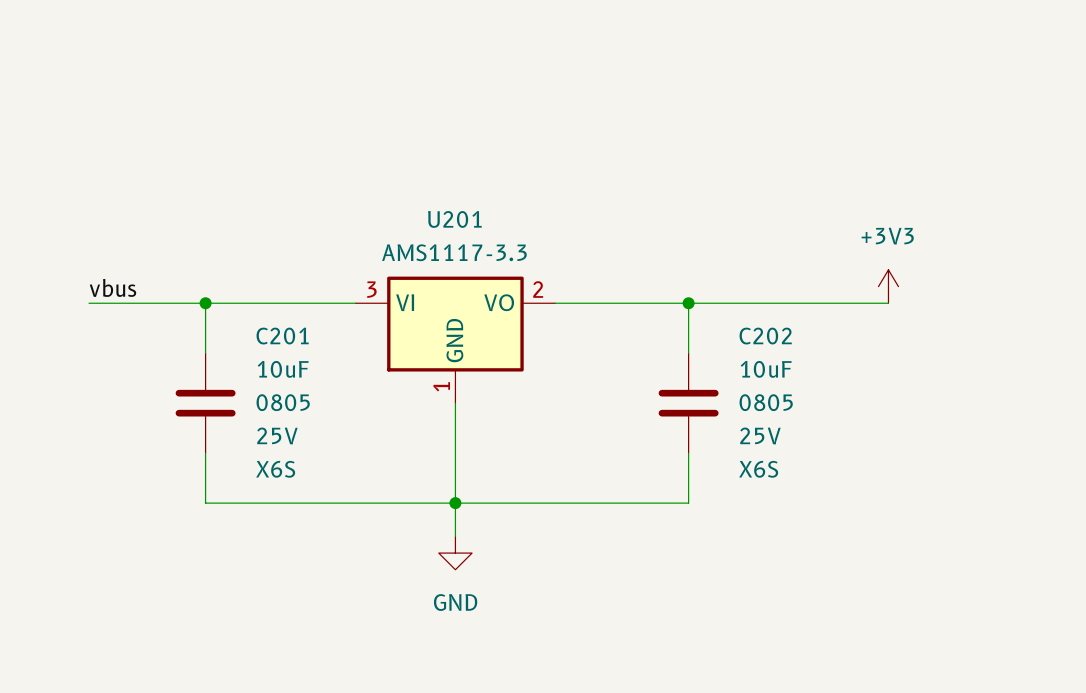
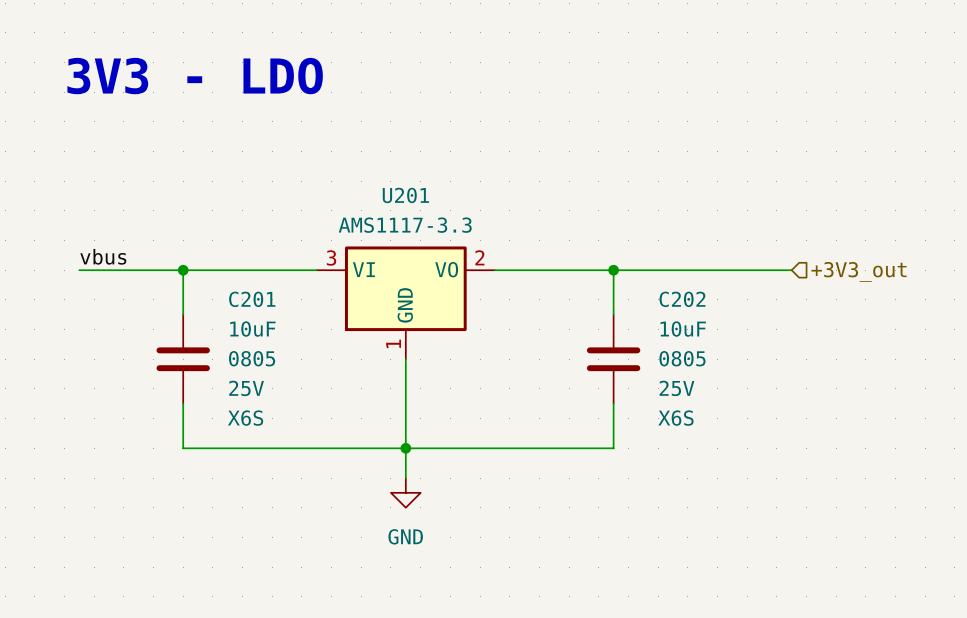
text: none -> 3V3 - LDO (195, 76)
power symbol: +3V3 (888, 286) -> none
hierarchical label: none -> +3V3_out (859, 271)

